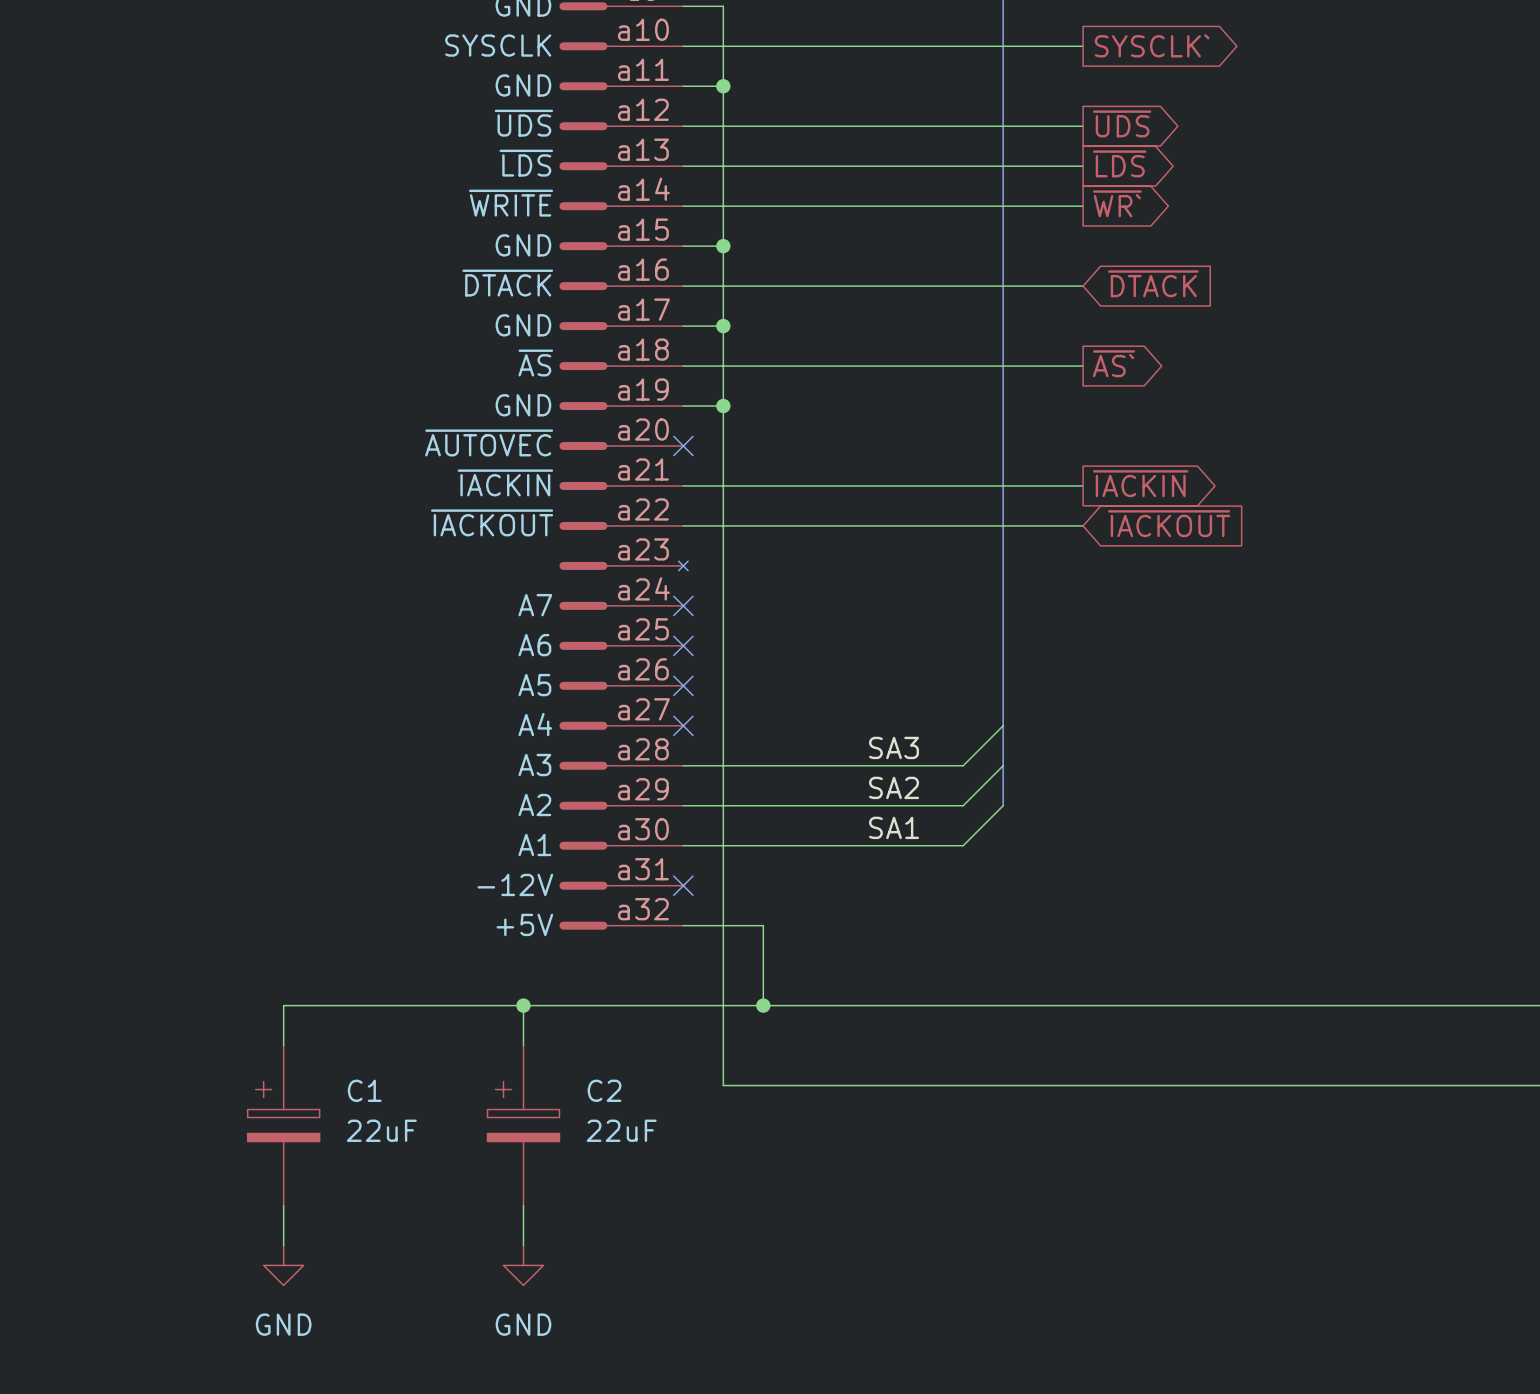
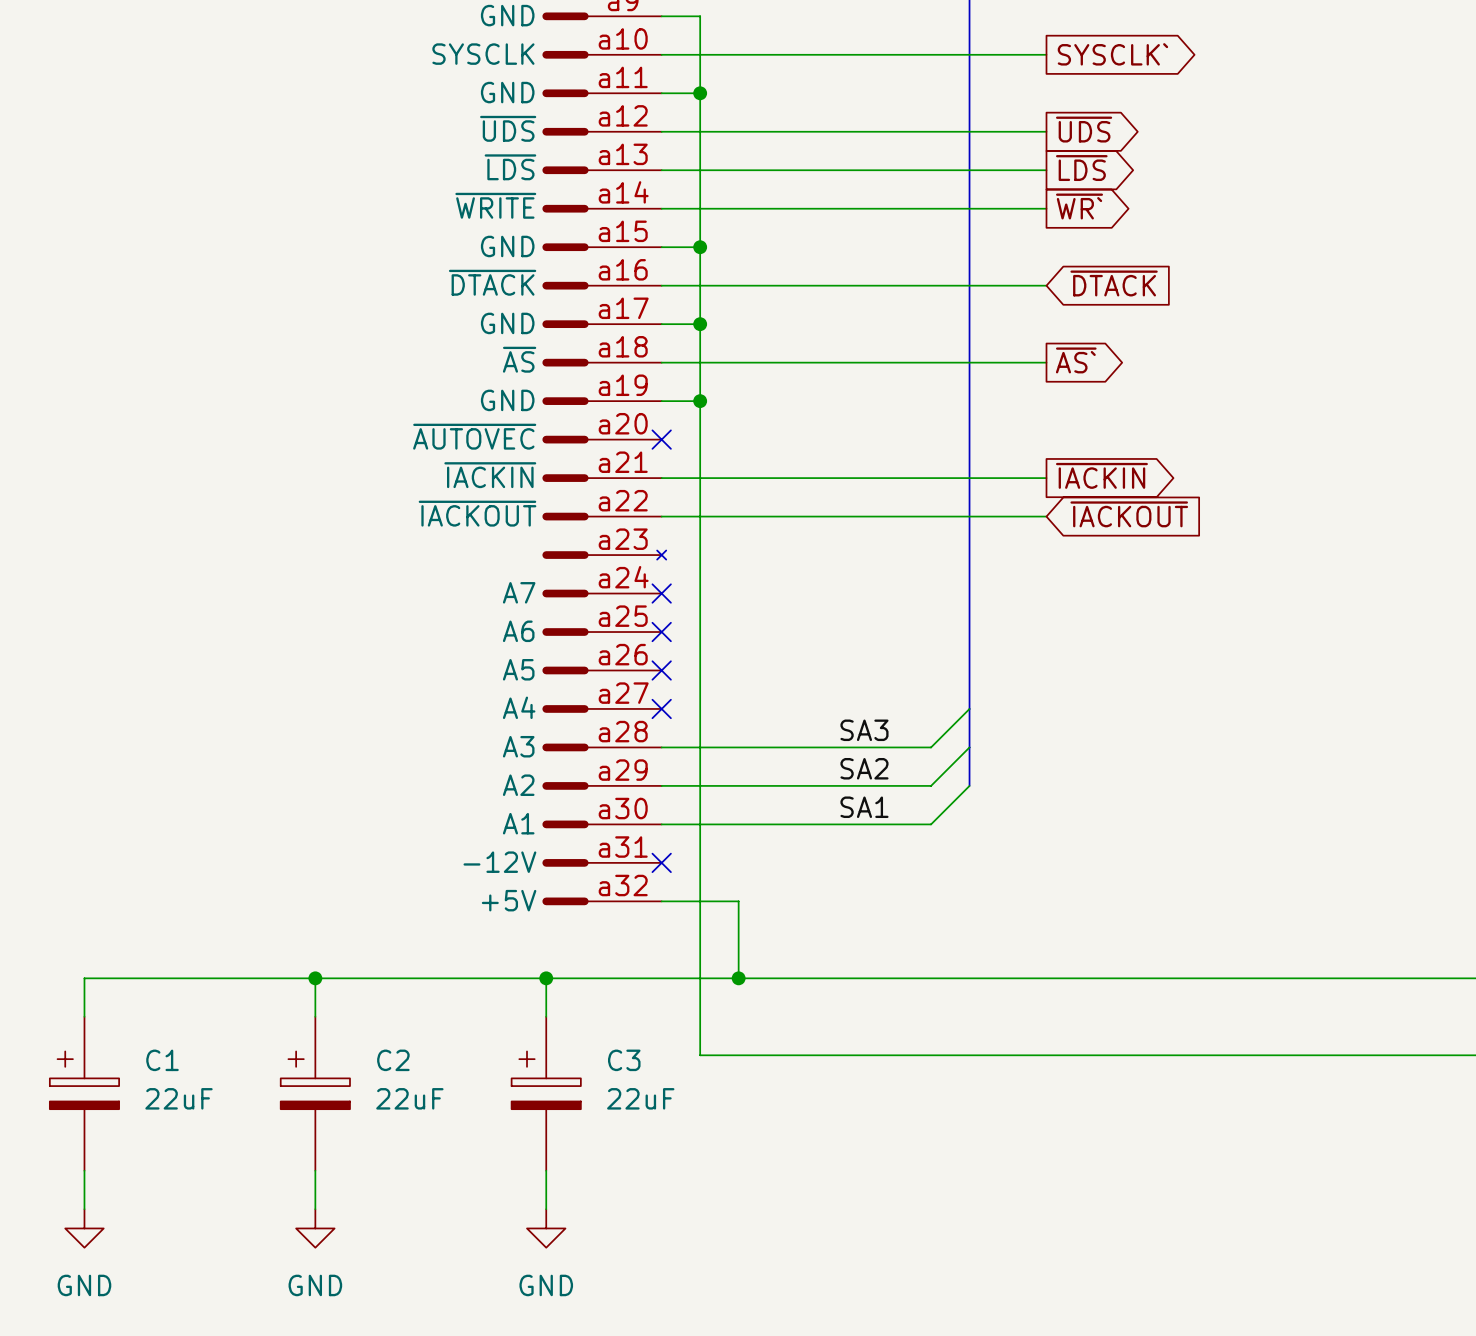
wire: (283, 1005) (283, 1045) -> (276, 978) (84, 978) (84, 1016)
wire: none -> (315, 978) (315, 1016)
junction: none -> (315, 978)
wire: (523, 1005) (523, 1045) -> (546, 978) (546, 1016)
junction position: (523, 1005) -> (546, 978)
C1 position: (283, 1125) -> (84, 1093)
C2 position: (523, 1125) -> (315, 1093)
C3: none -> 22uF (546, 1093)
wire: none -> (84, 1170) (84, 1209)
wire: (283, 1205) (283, 1245) -> (315, 1170) (315, 1209)
wire: (523, 1205) (523, 1245) -> (546, 1170) (546, 1209)
power symbol: none -> GND (84, 1228)
power symbol position: GND (283, 1265) -> GND (315, 1228)
power symbol position: GND (523, 1265) -> GND (546, 1228)

